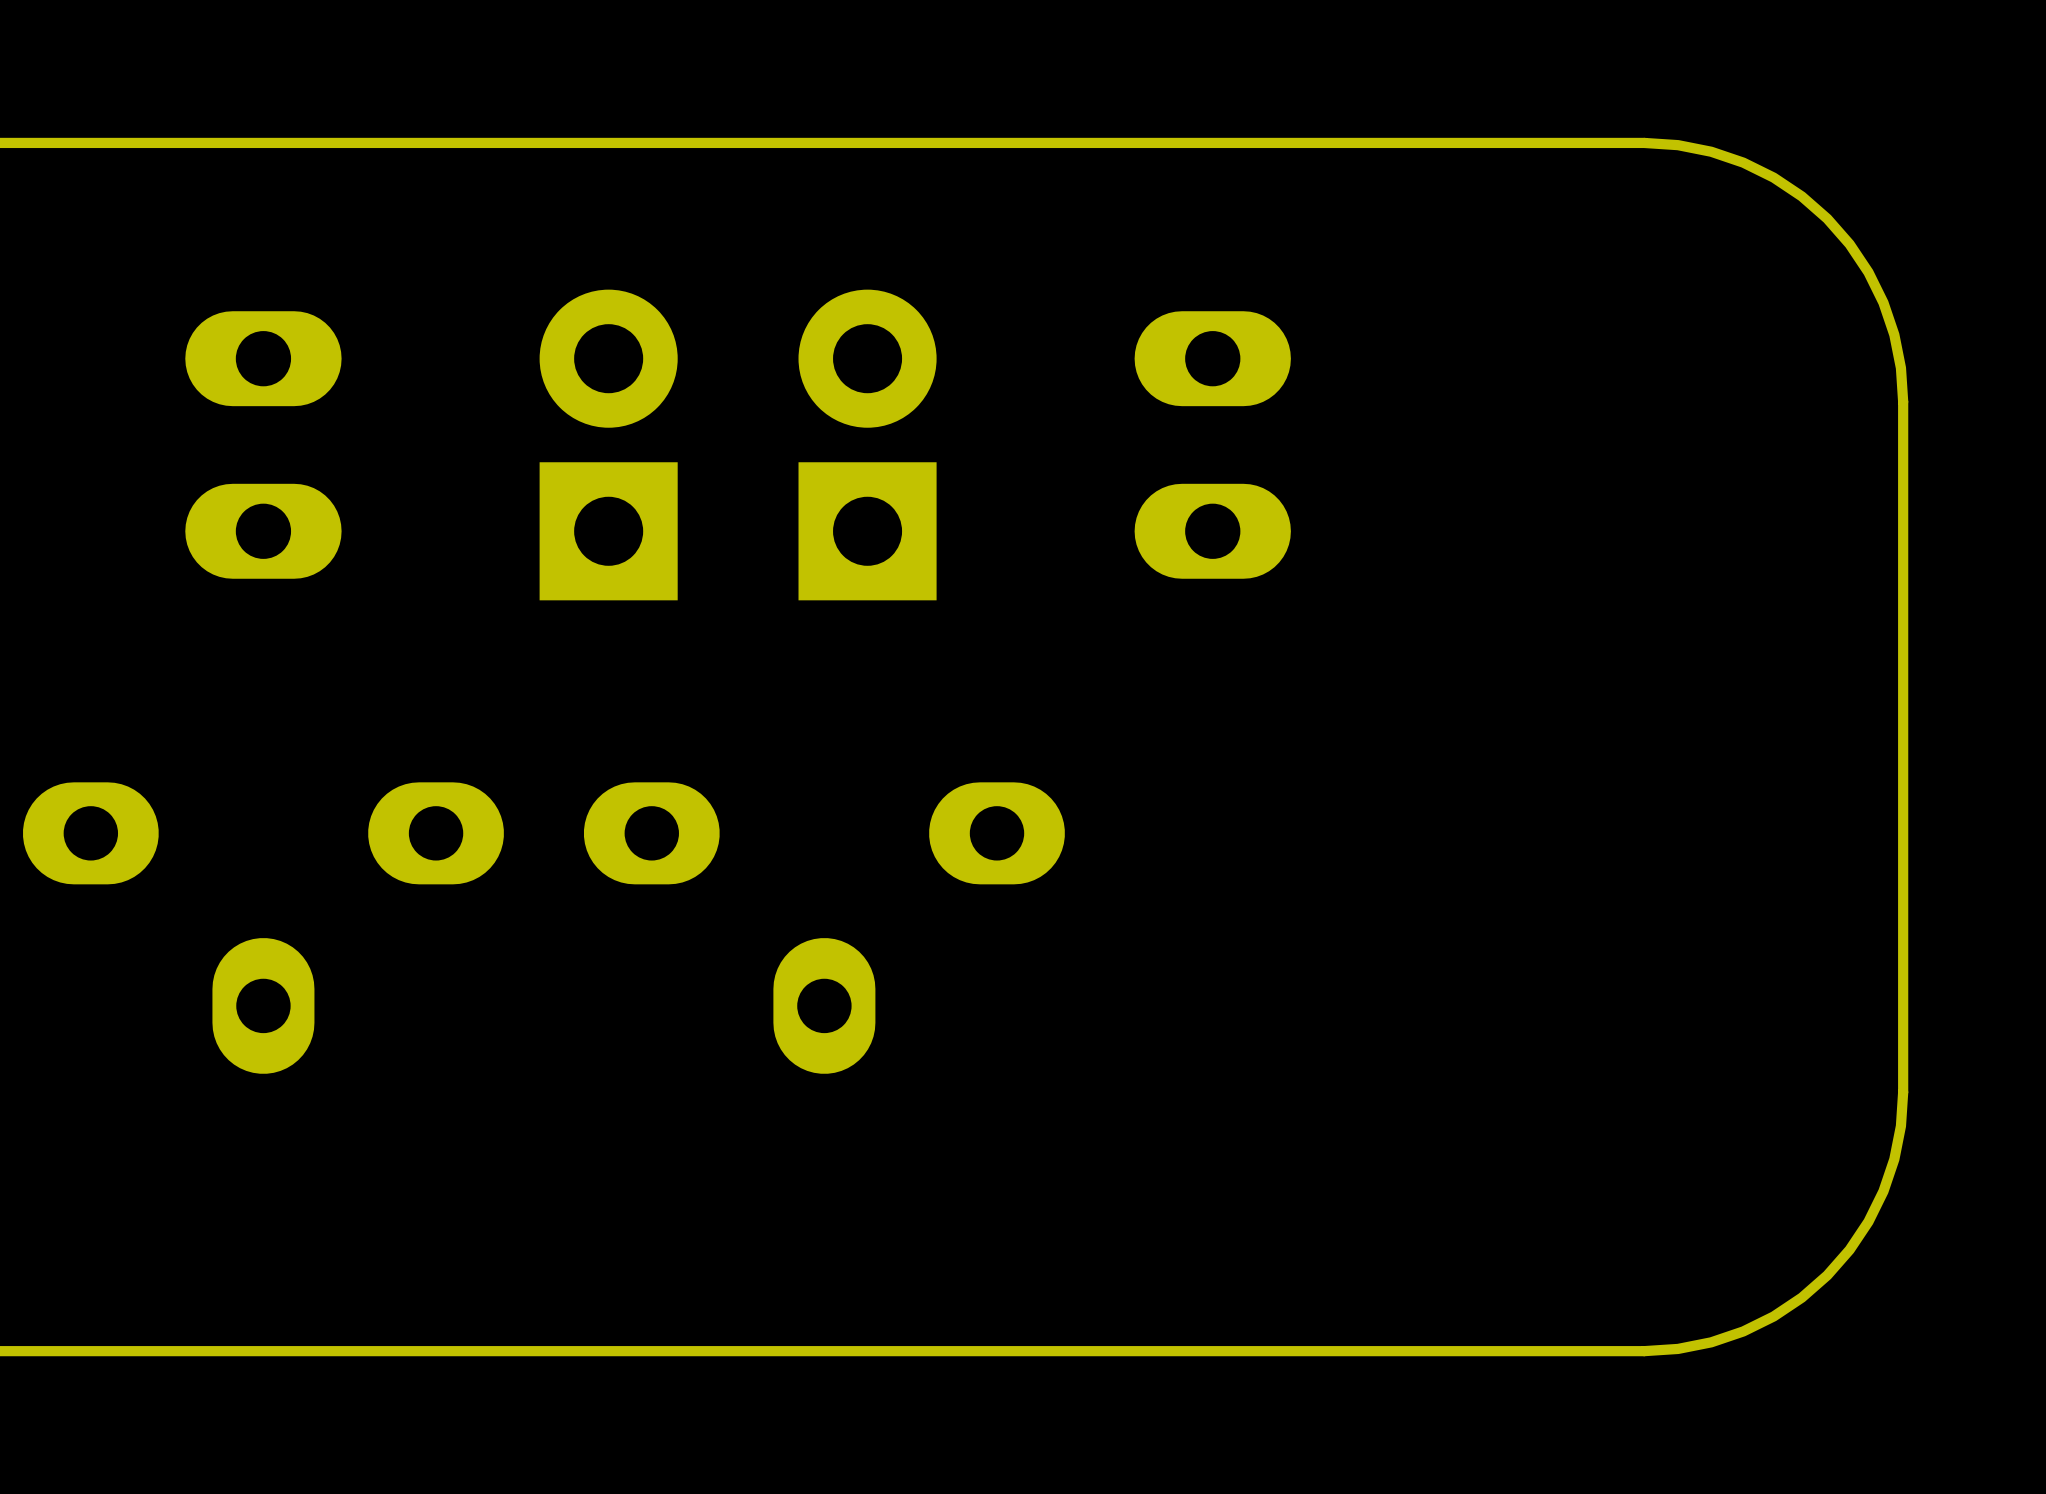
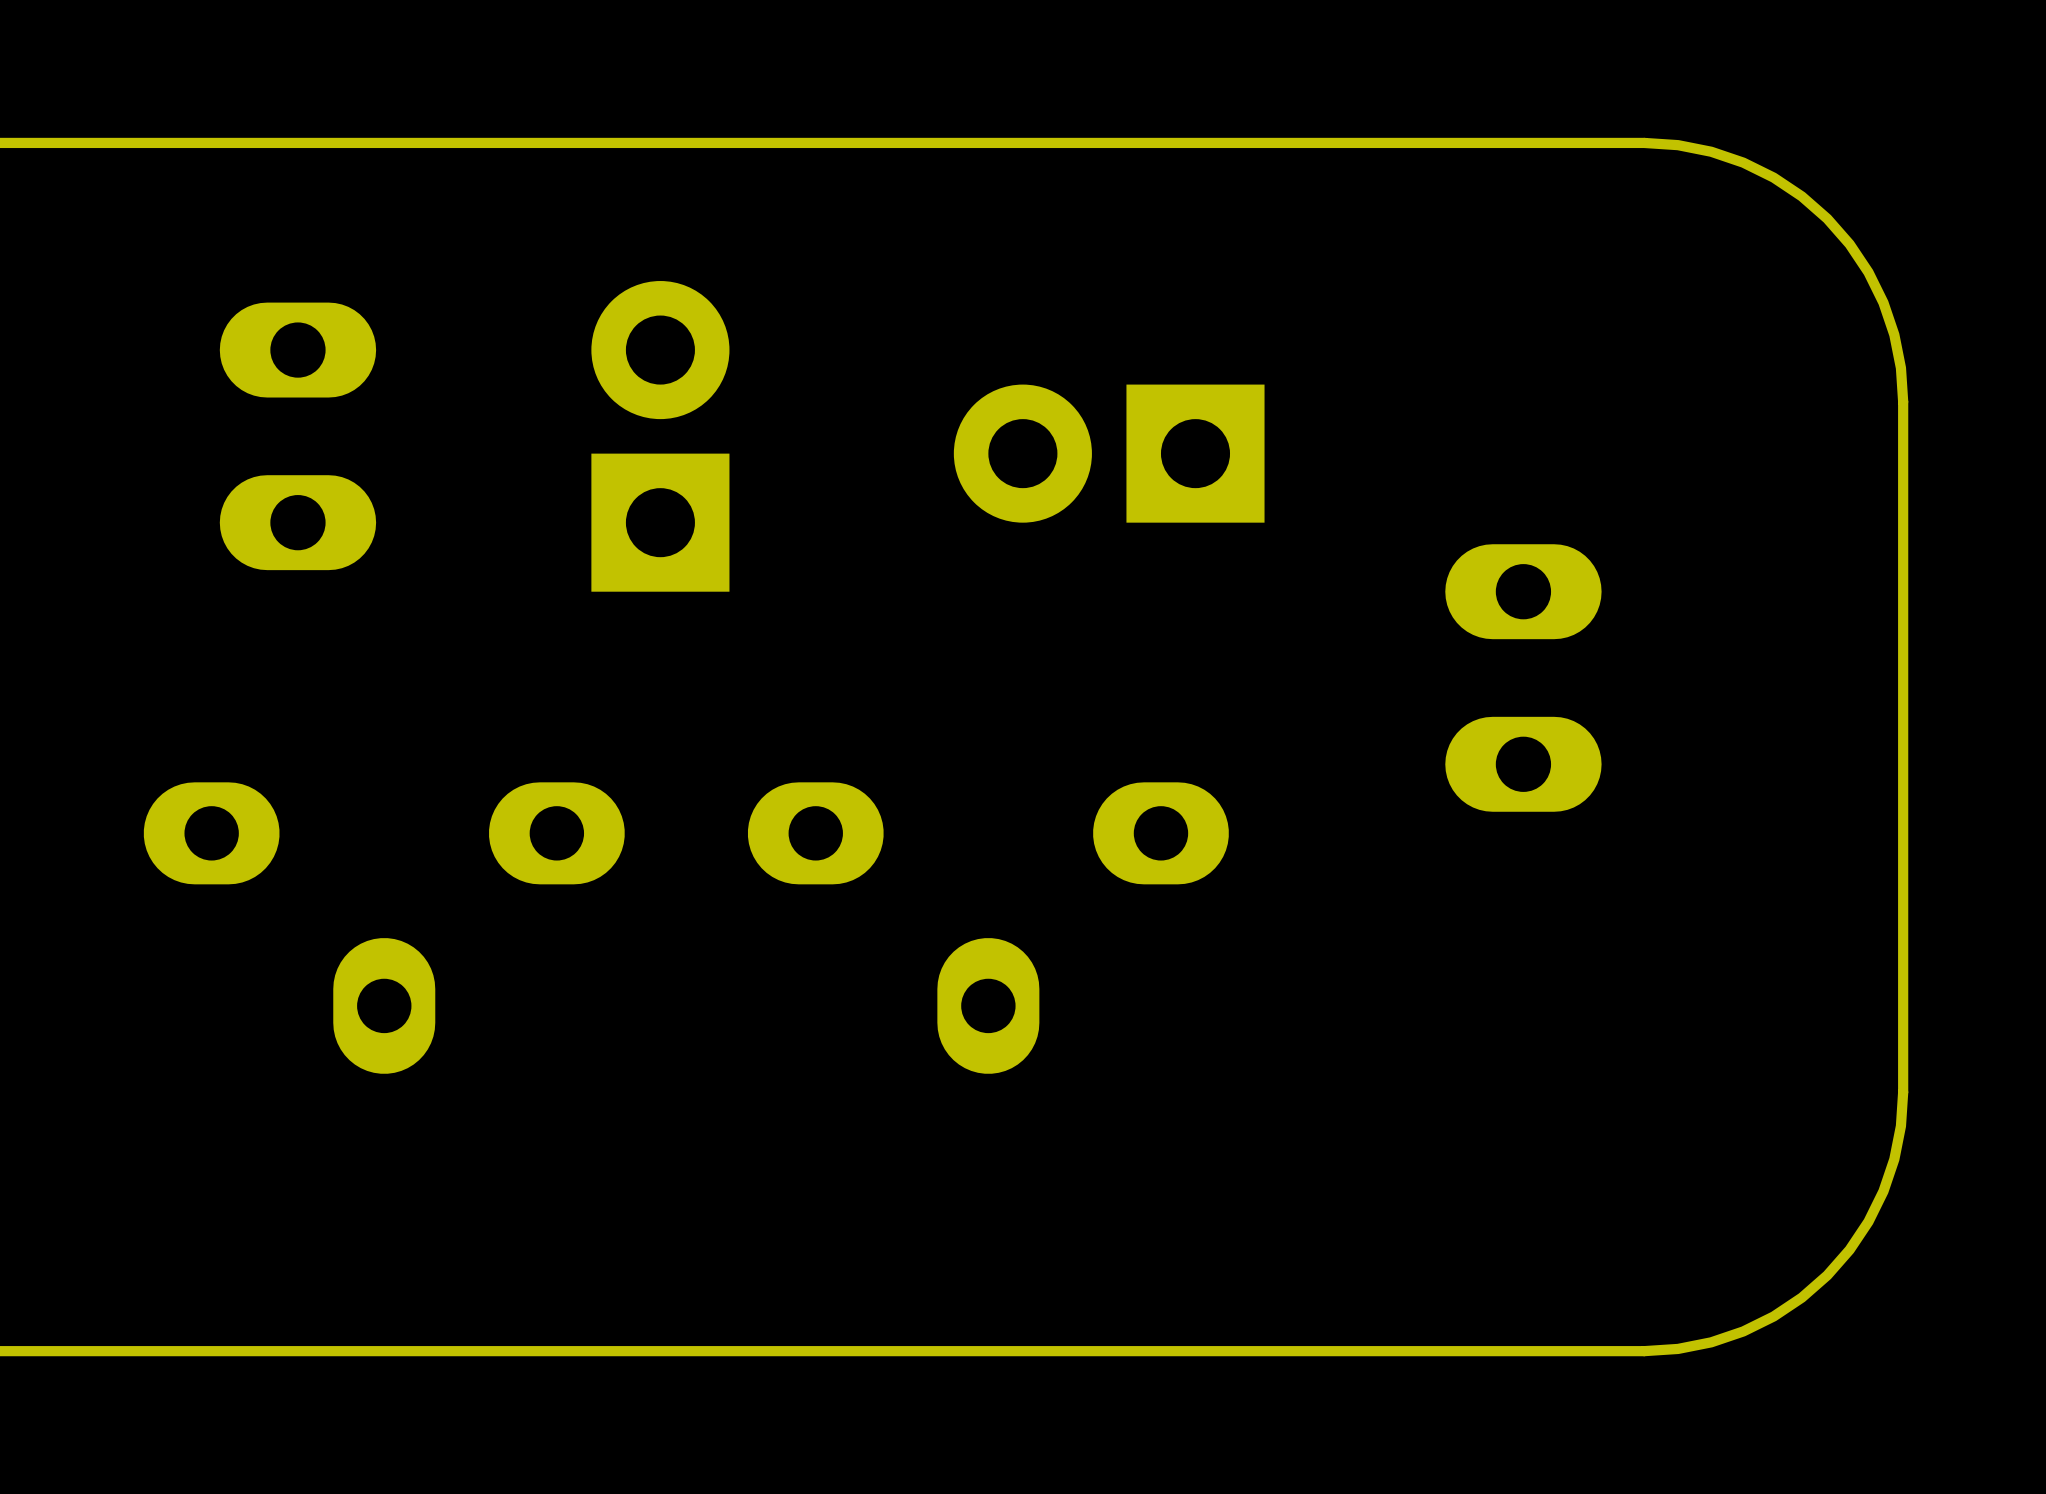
part position: (263, 444) -> (297, 436)
part position: (608, 444) -> (660, 436)
part rotation: 0° (867, 444) -> 90° counterclockwise (1109, 453)
part position: (867, 444) -> (1109, 453)
part position: (1212, 444) -> (1523, 678)
part position: (263, 928) -> (384, 928)
part position: (824, 928) -> (988, 928)

